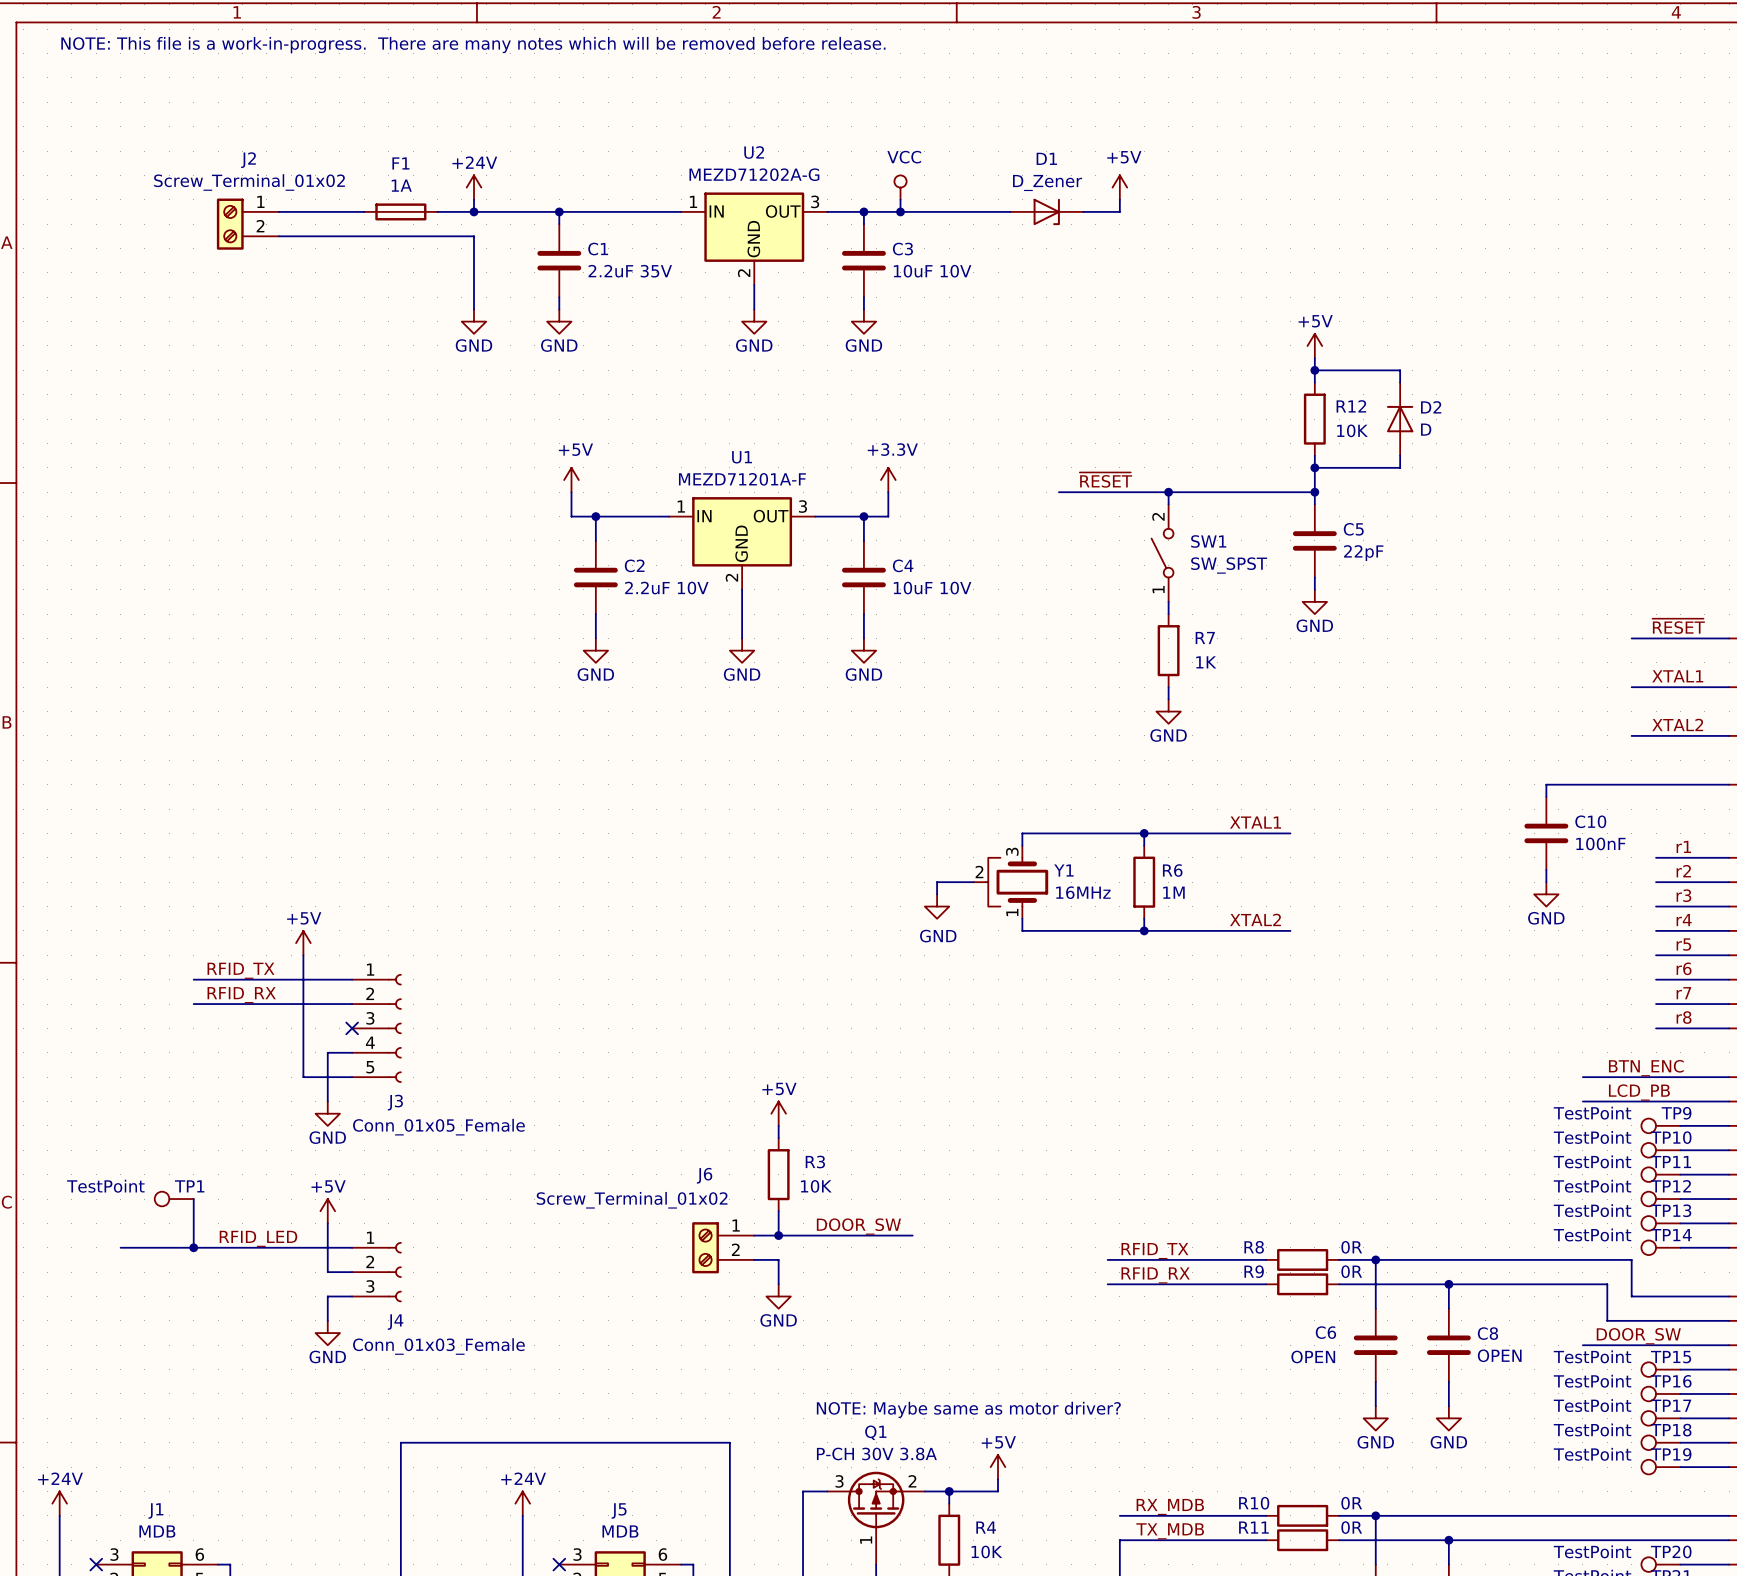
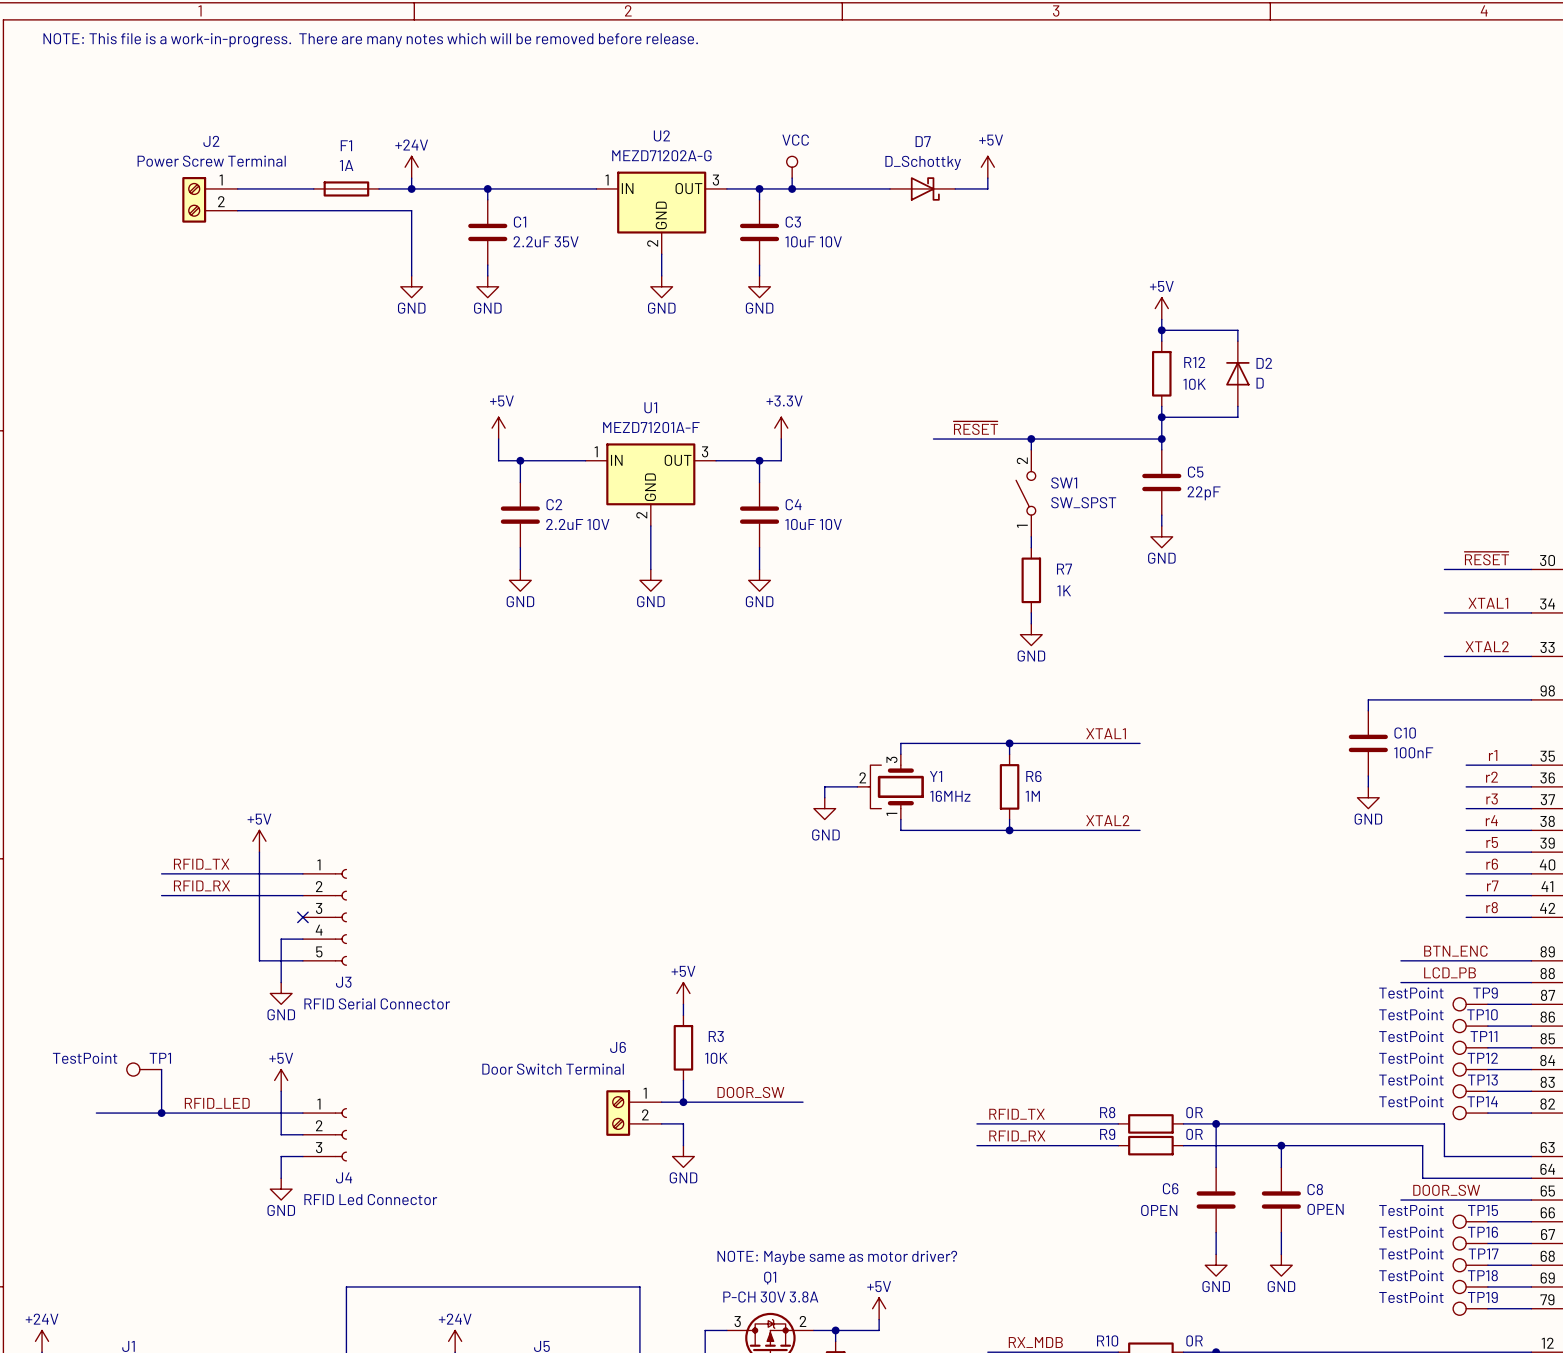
J2 value: Screw_Terminal_01x02 (249, 182) -> Power Screw Terminal (211, 161)
D1: D_Zener (1046, 211) -> none
D7: none -> D_Schottky (922, 188)
J3 value: Conn_01x05_Female (438, 1127) -> RFID Serial Connector (377, 1003)
J6 value: Screw_Terminal_01x02 (632, 1200) -> Door Switch Terminal (553, 1069)
J4 value: Conn_01x03_Female (438, 1346) -> RFID Led Connector (370, 1199)

